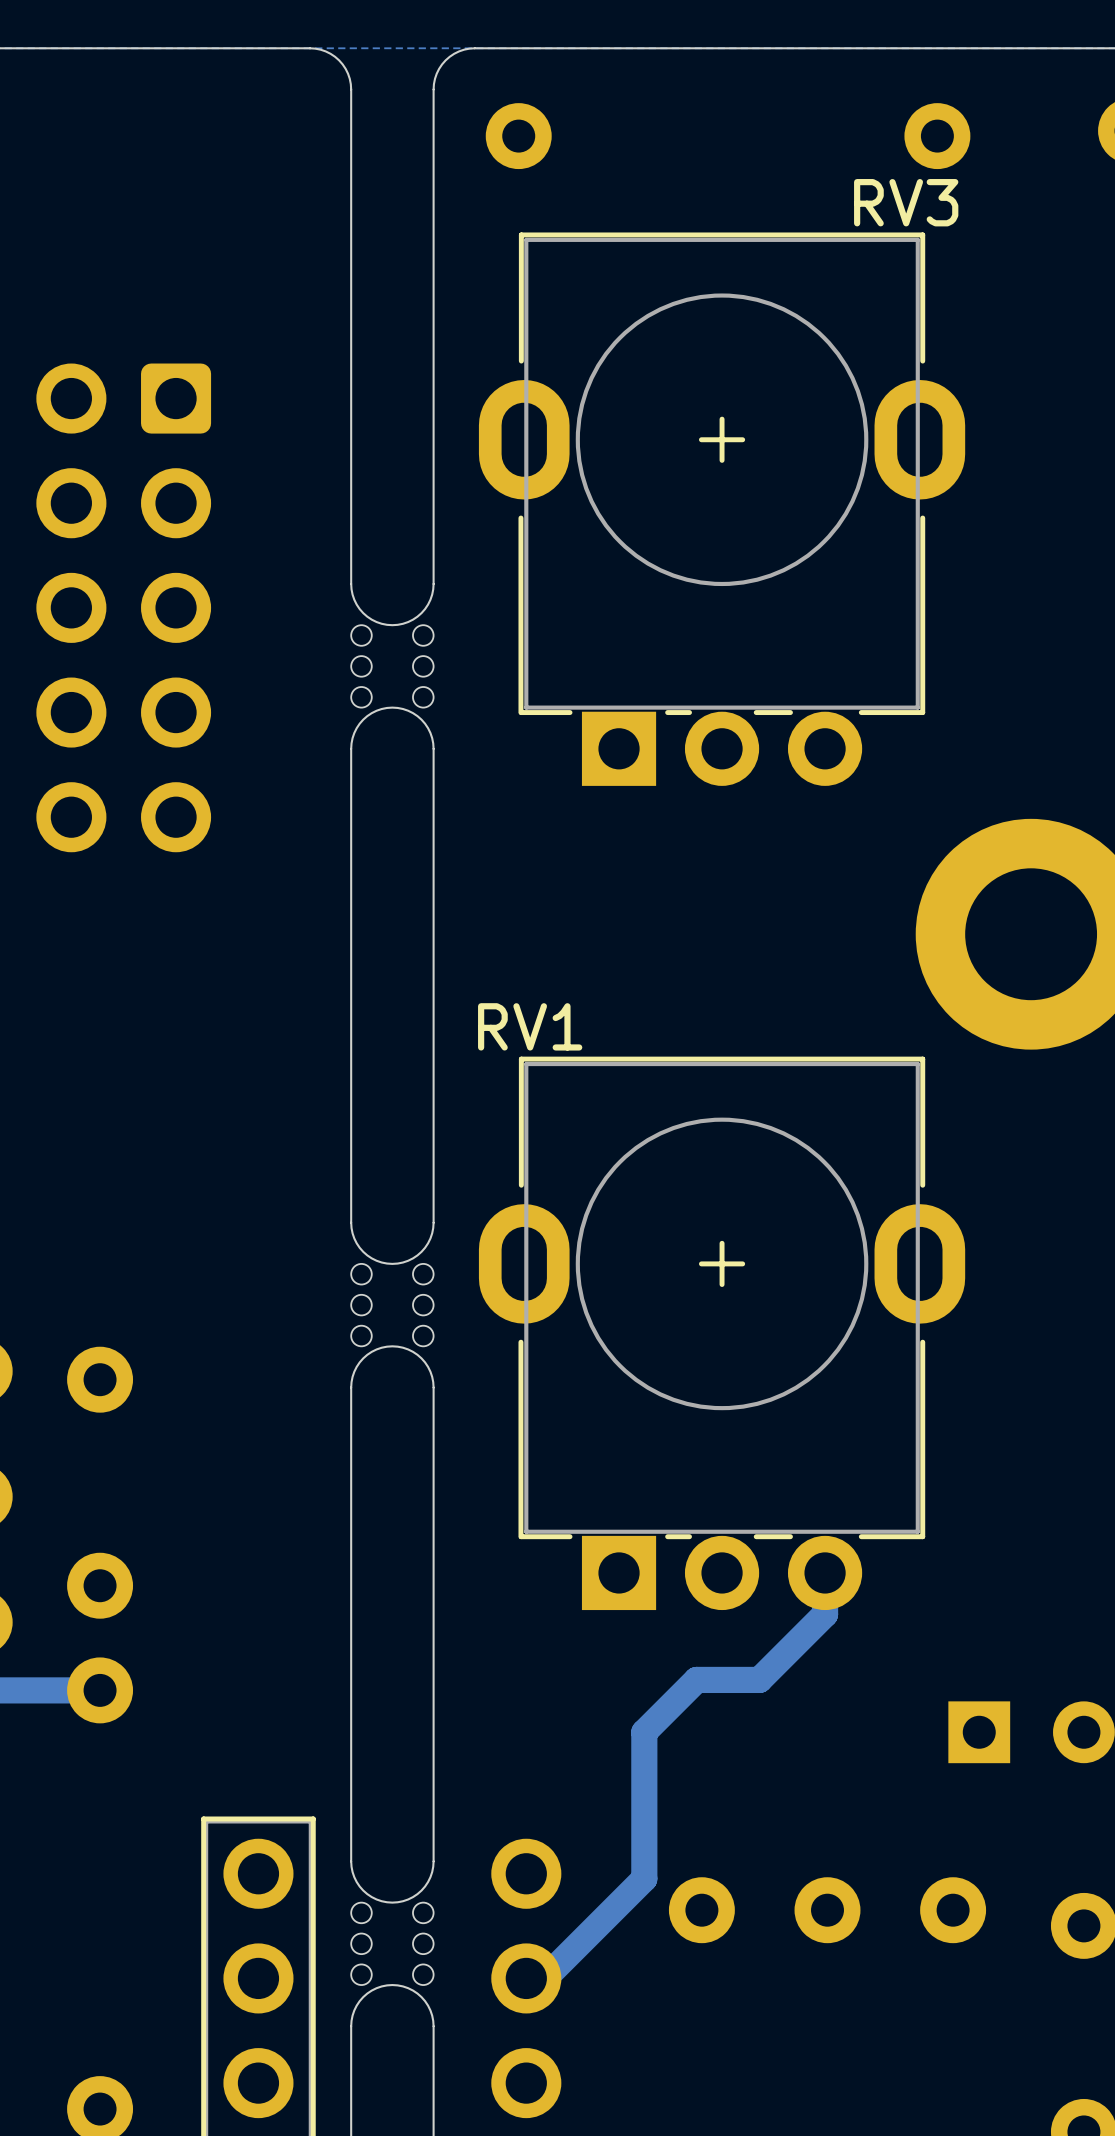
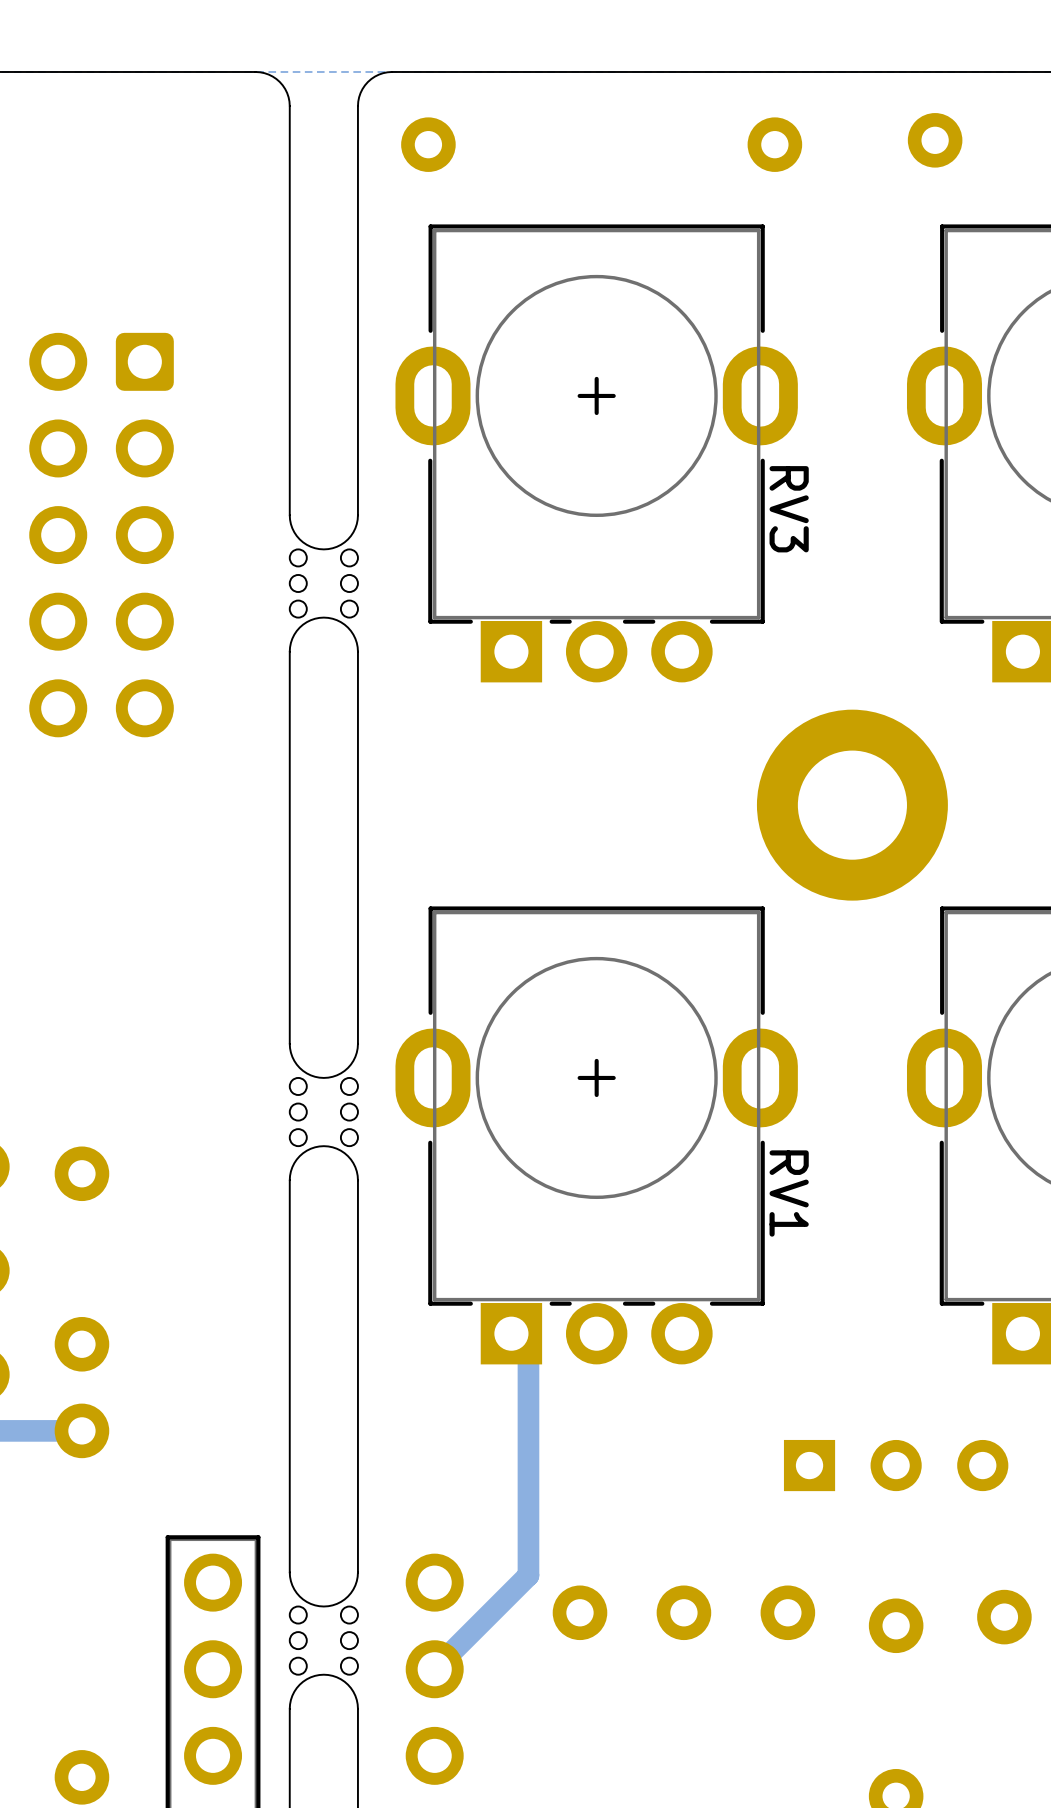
RV3 name rotation: 0° (906, 202) -> 90° clockwise (789, 509)
RV3 name position: RV3 (906, 202) -> RV3 (789, 509)
RV1 name rotation: 0° (530, 1026) -> 90° clockwise (789, 1193)
RV1 name position: RV1 (530, 1026) -> RV1 (789, 1193)
track: (825, 1572) (825, 1614) (759, 1679) (696, 1679) (644, 1732) (644, 1878) (544, 1978) (526, 1978) -> (528, 1350) (528, 1575) (434, 1669)

